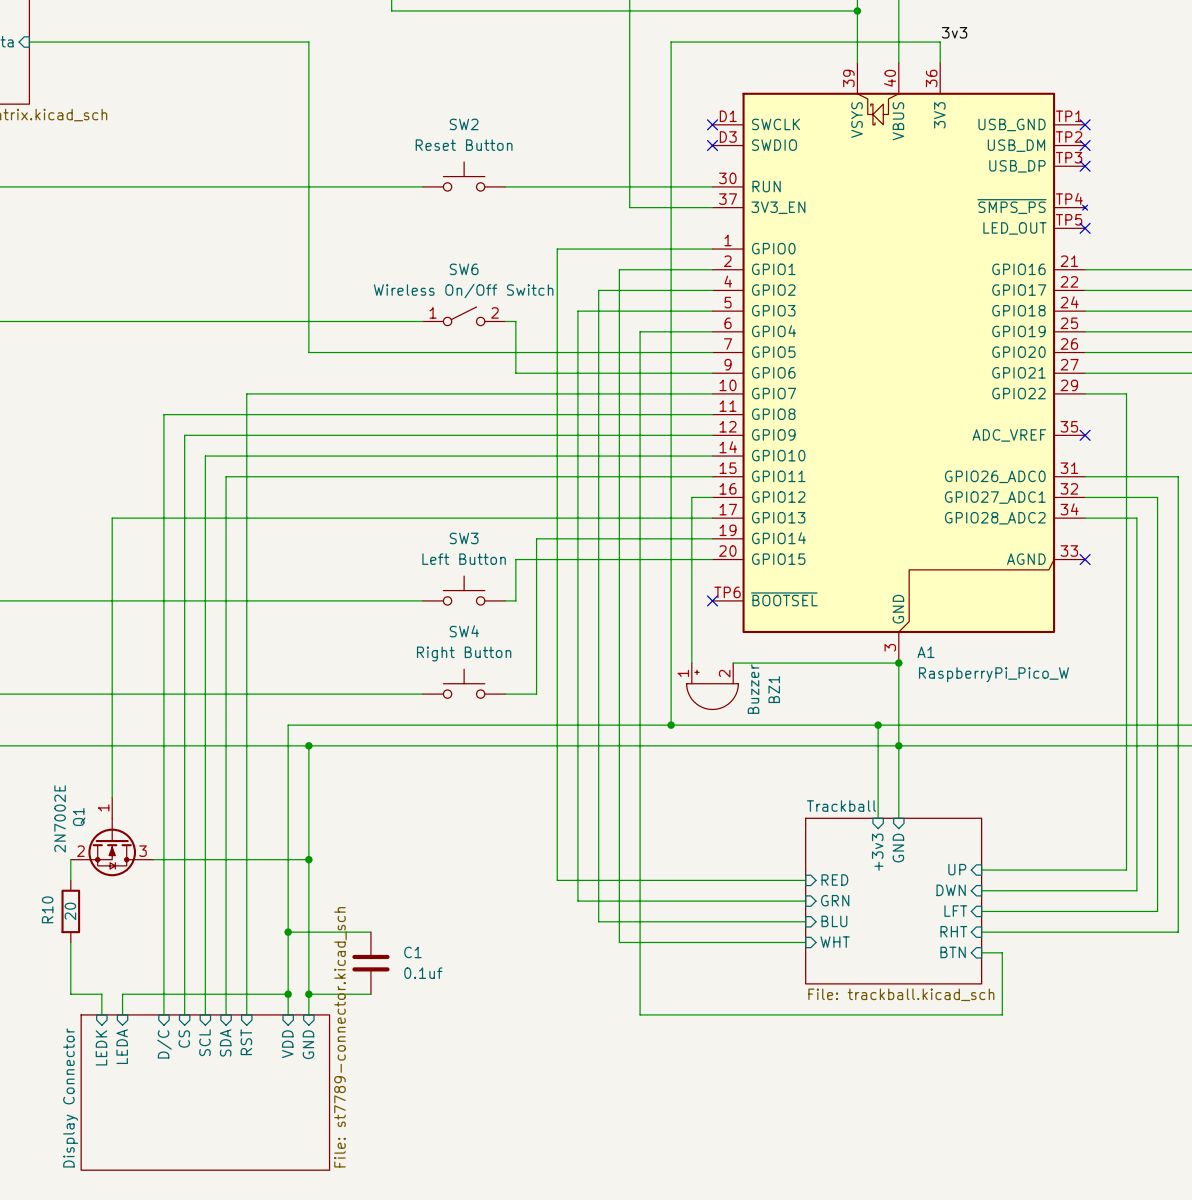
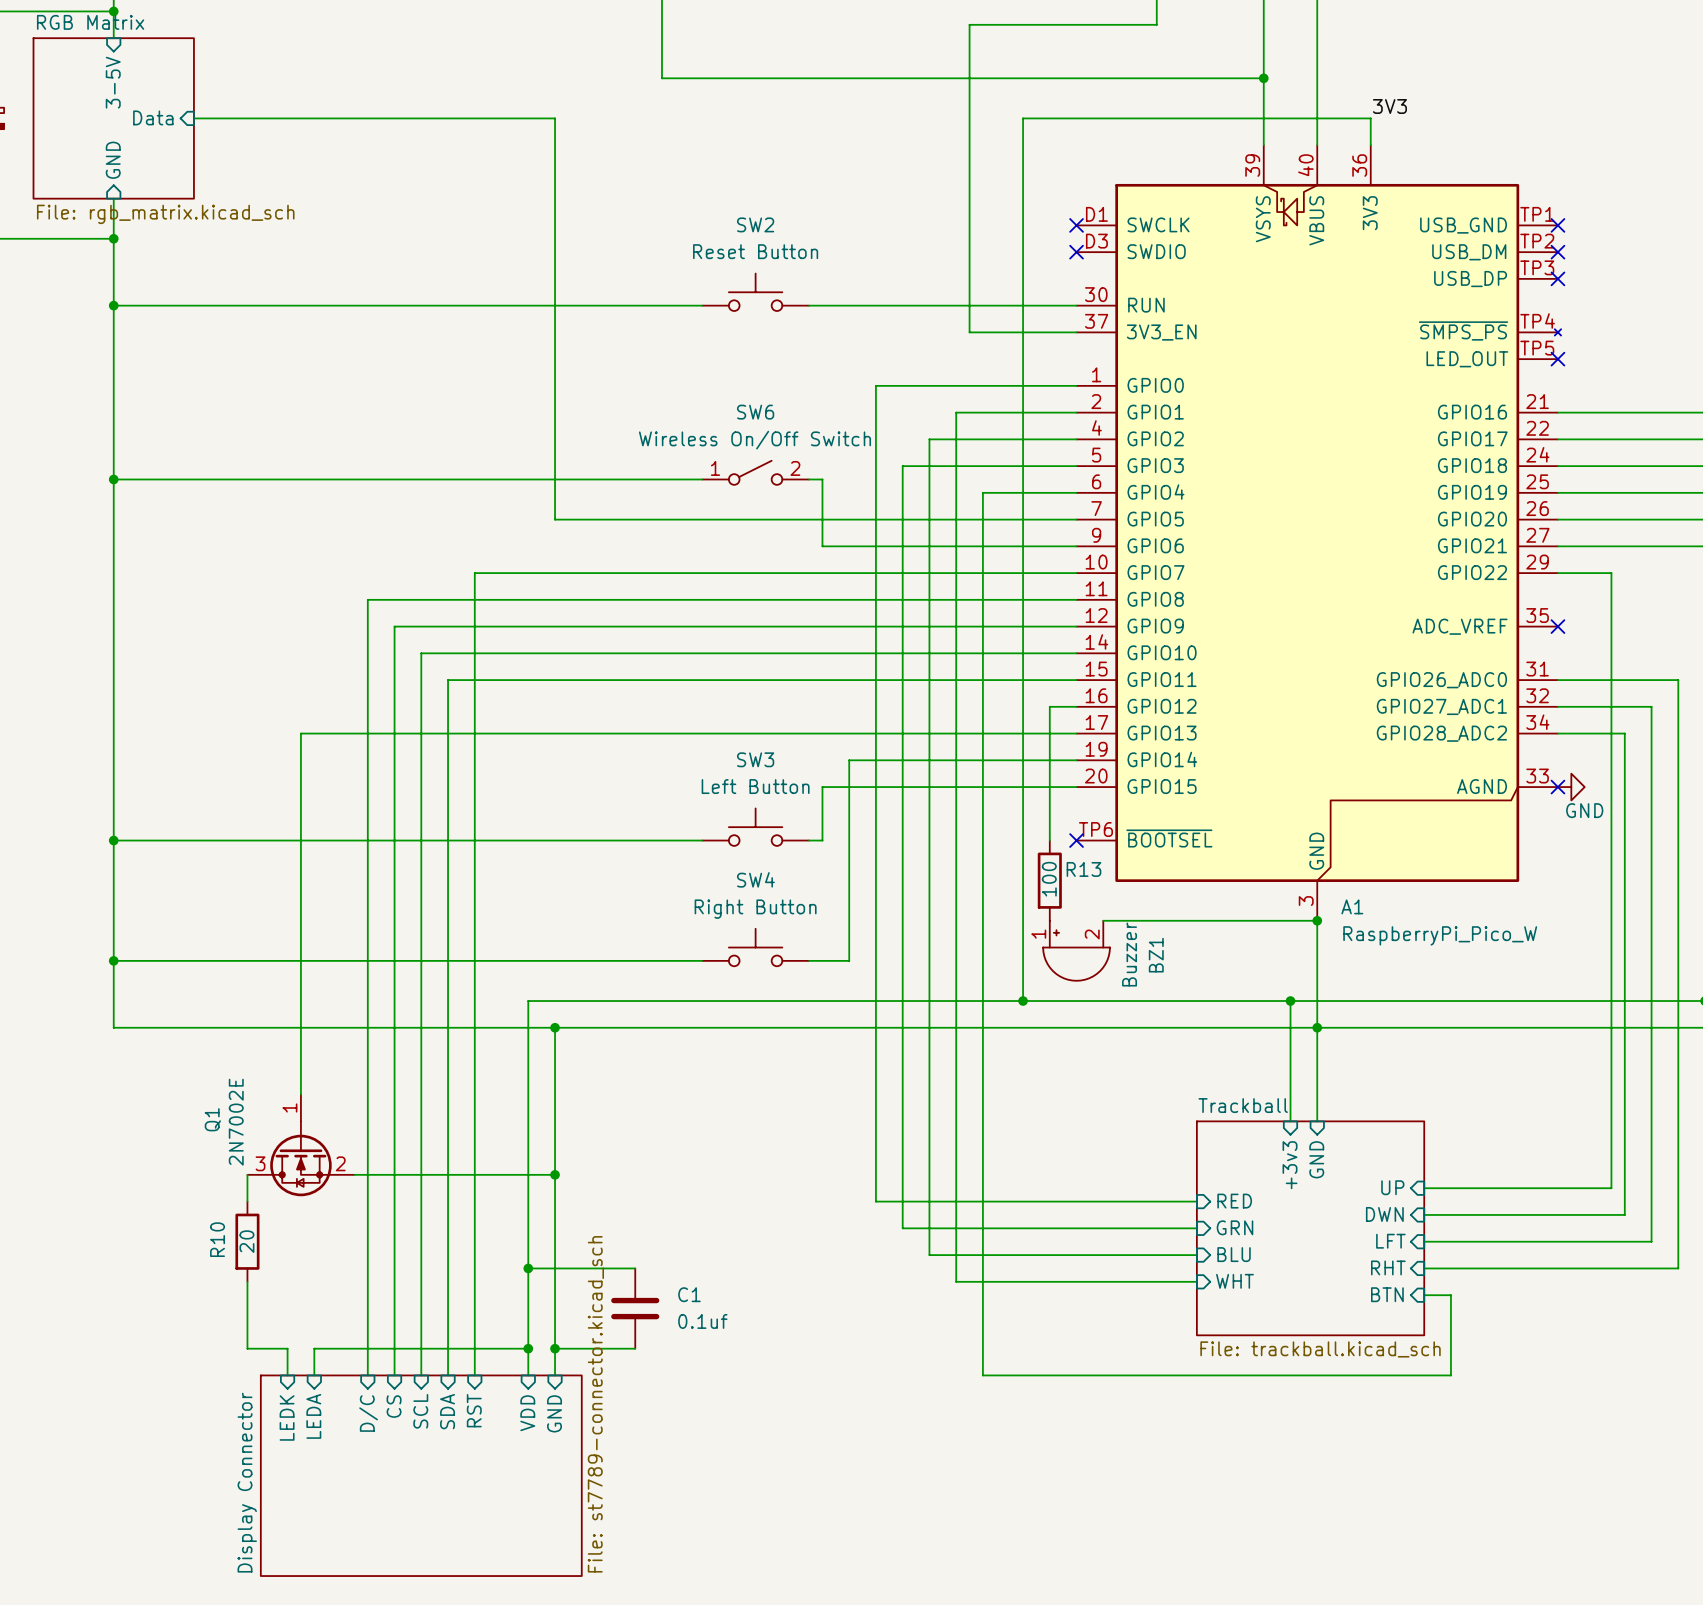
label: 3v3 (954, 32) -> 3V3 (1389, 106)
power symbol: none -> GND (1571, 787)
wire: (691, 600) (691, 663) -> none
R13: none -> 100 (1049, 880)
Q1 name position: Q1 (79, 817) -> Q1 (212, 1119)
Q1 flip: as is (112, 847) -> left-right (300, 1158)

